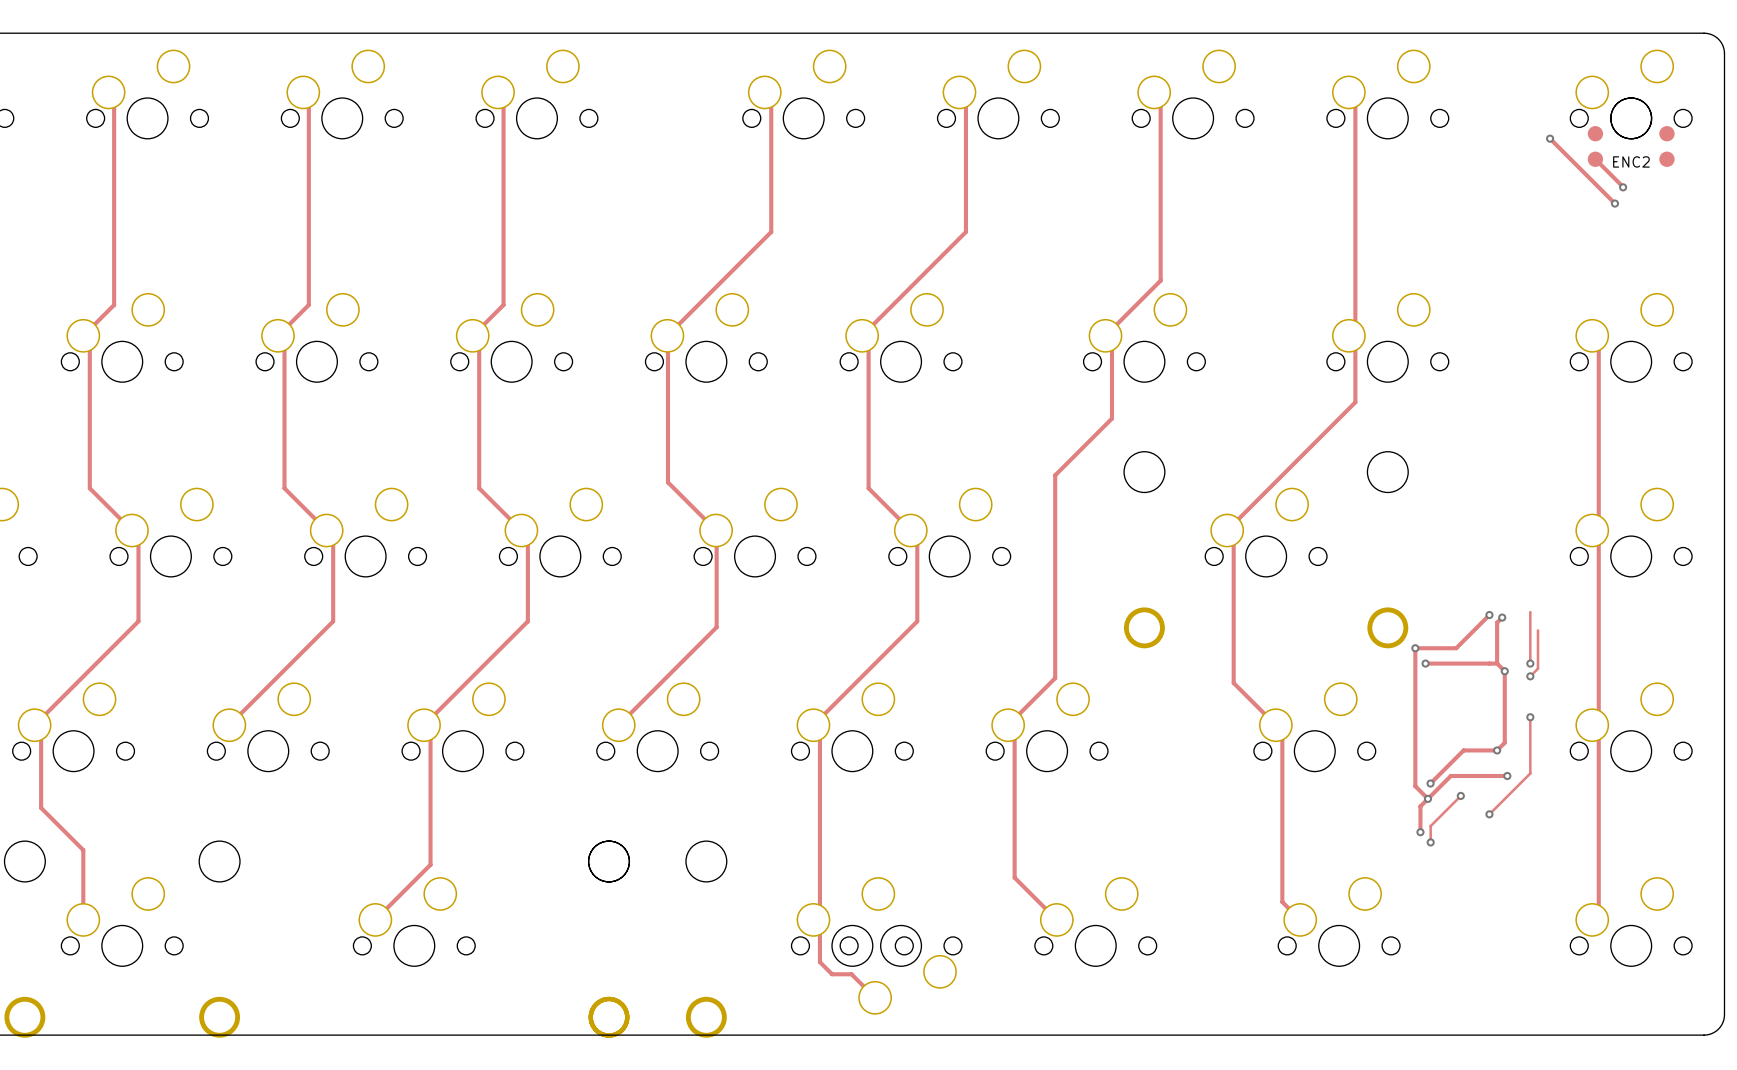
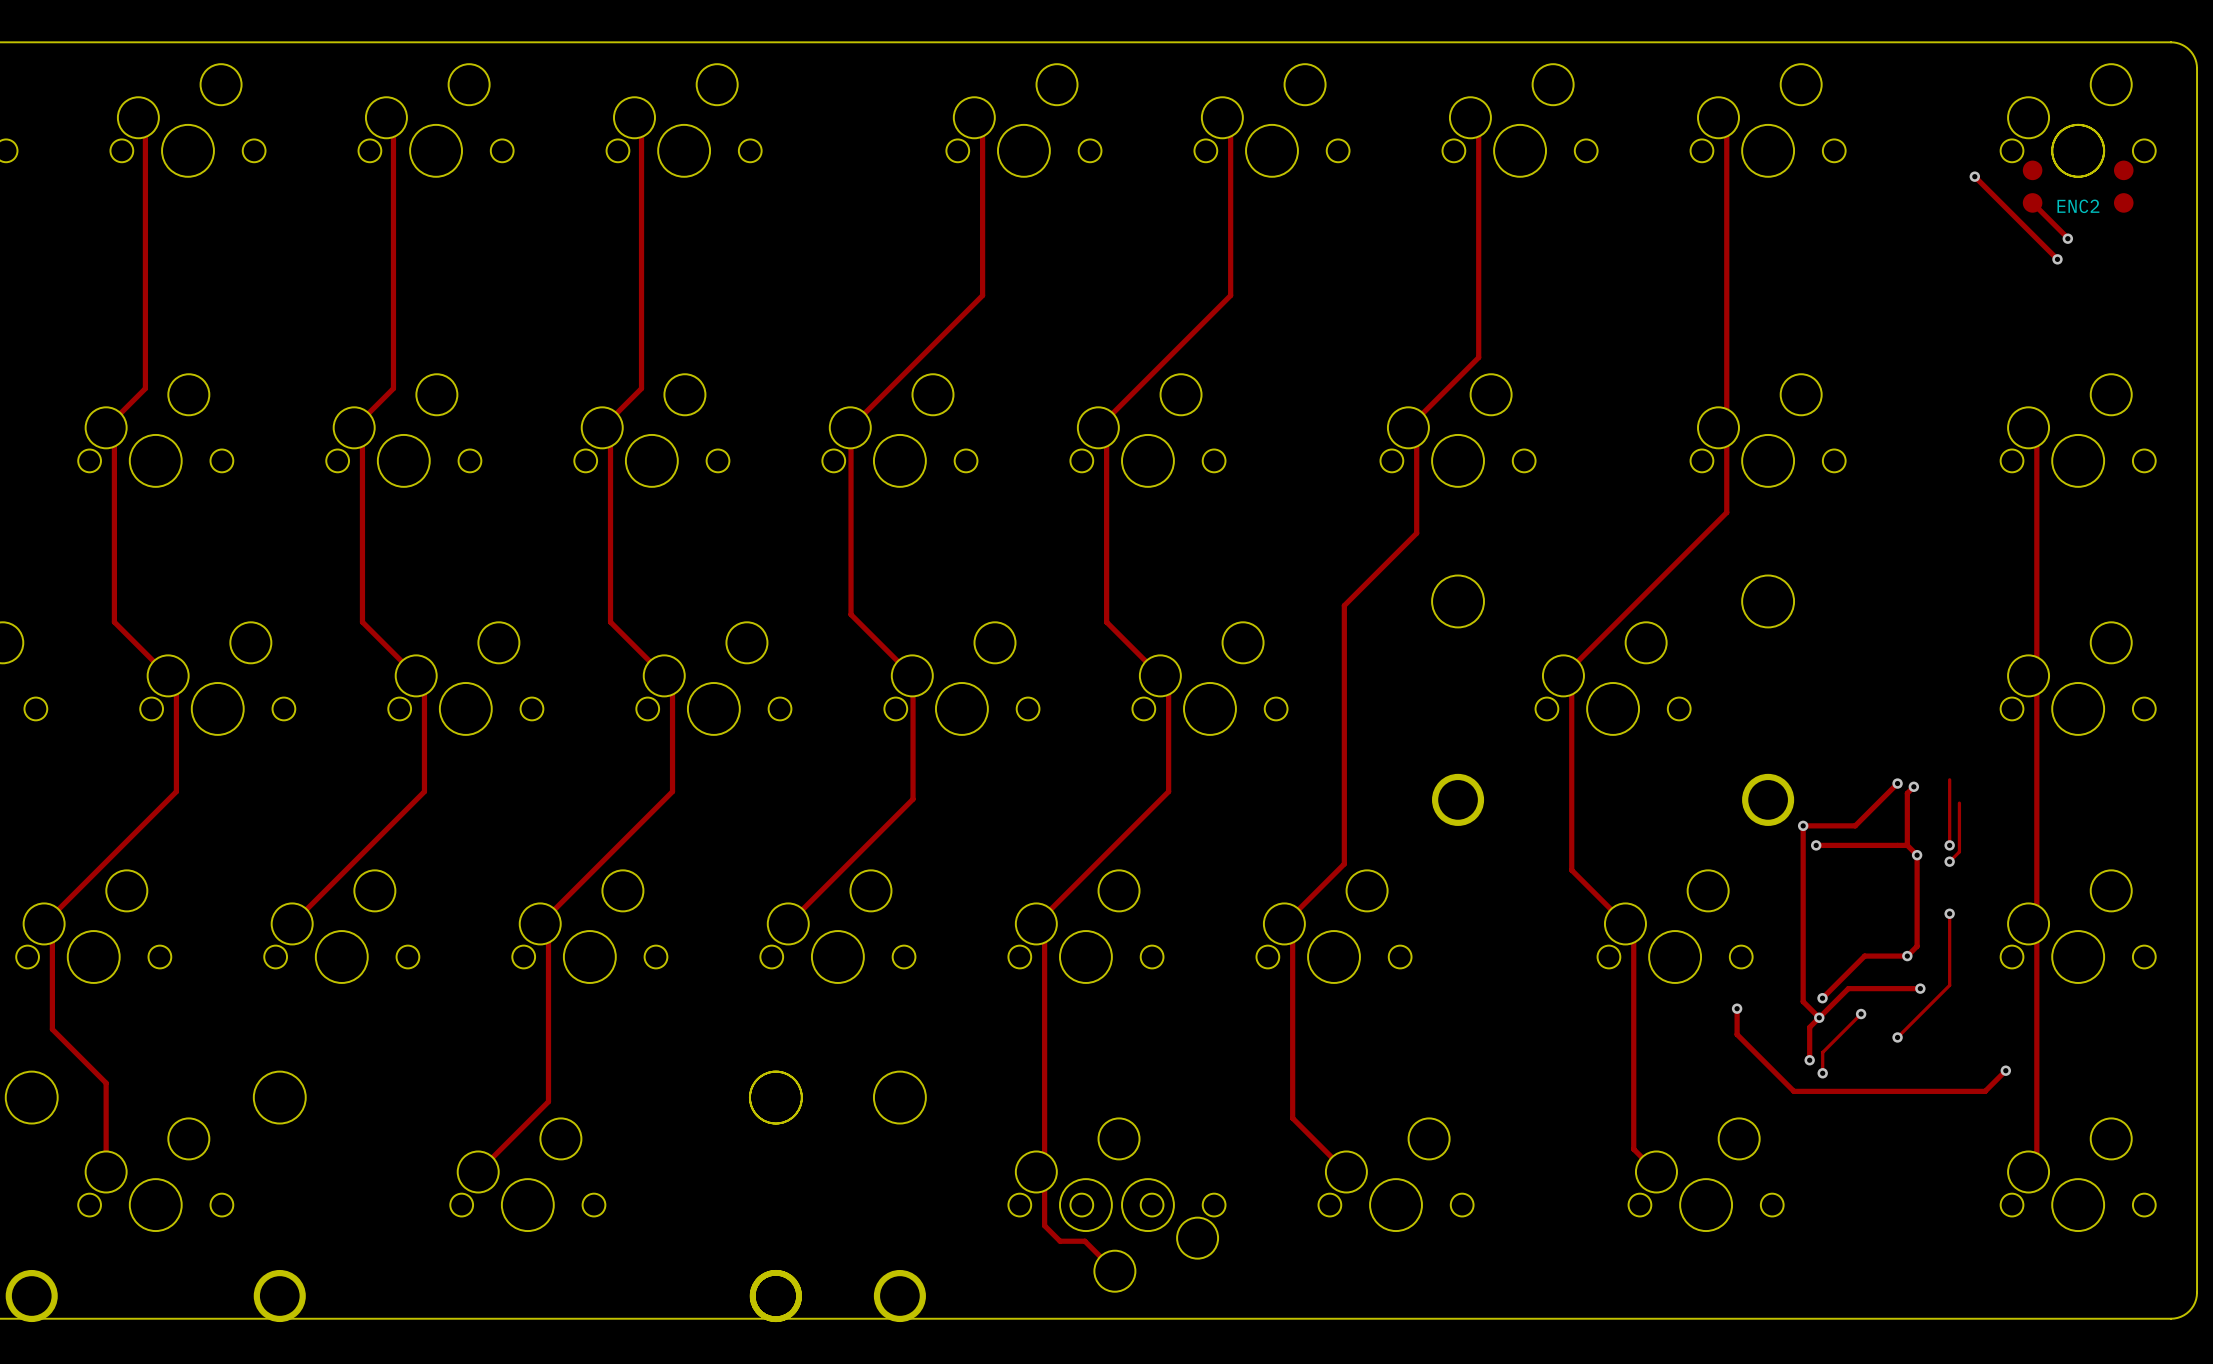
track: none -> (1737, 1008) (1737, 1034) (1793, 1091) (1985, 1091) (2005, 1070)
via: none -> (1737, 1008)
via: none -> (2005, 1070)

